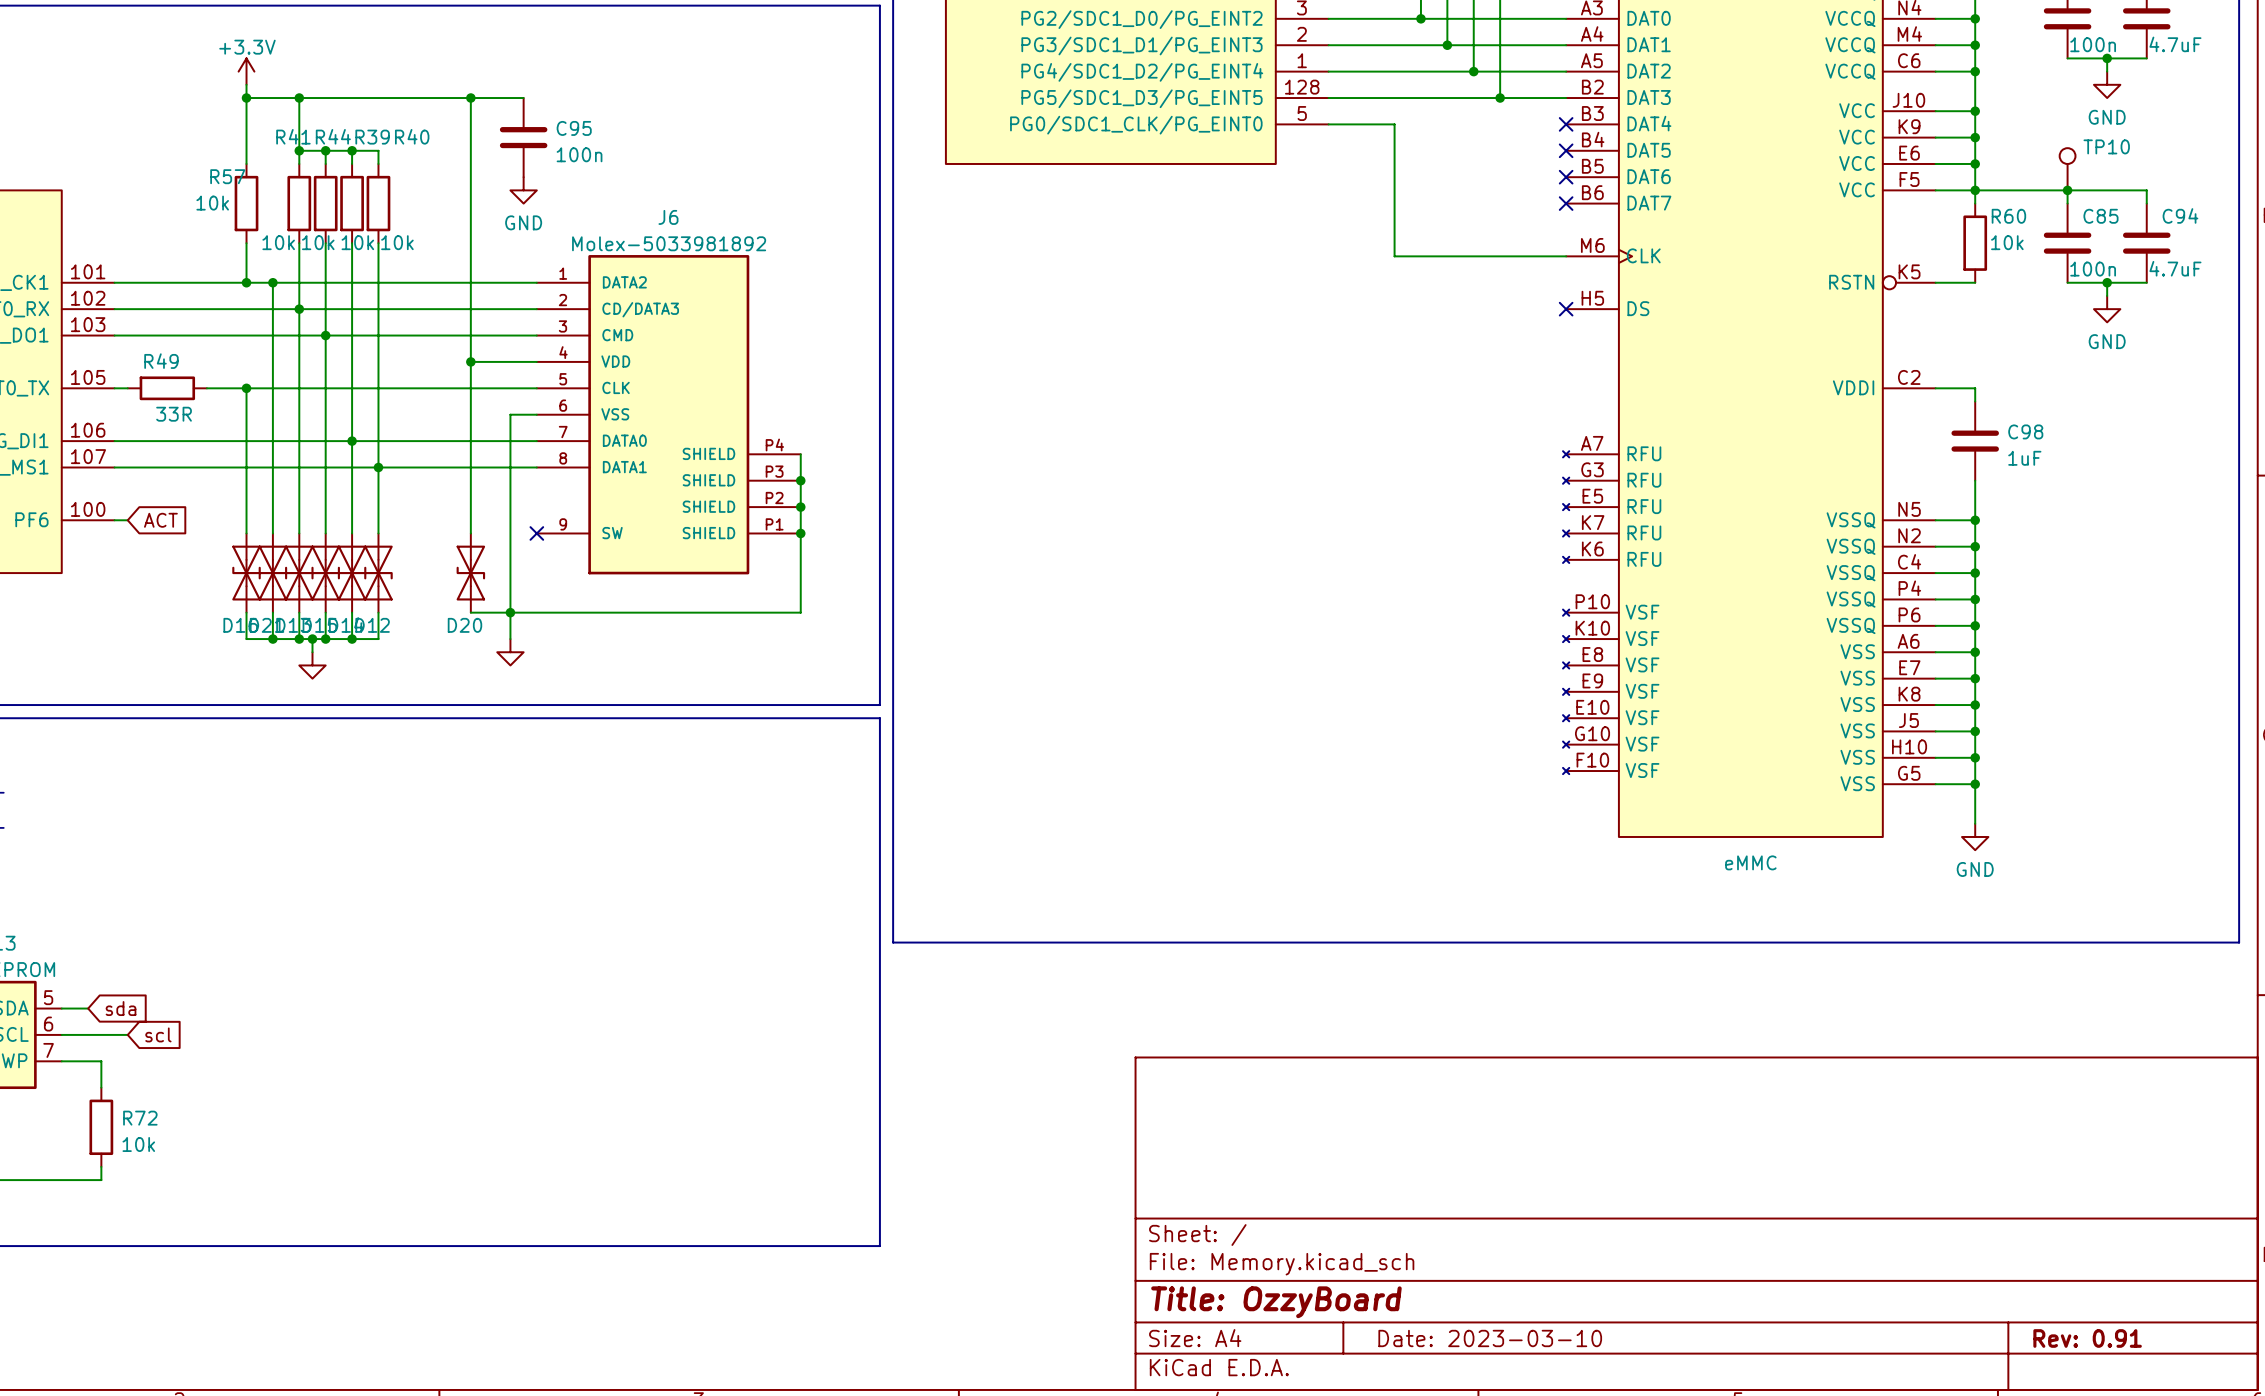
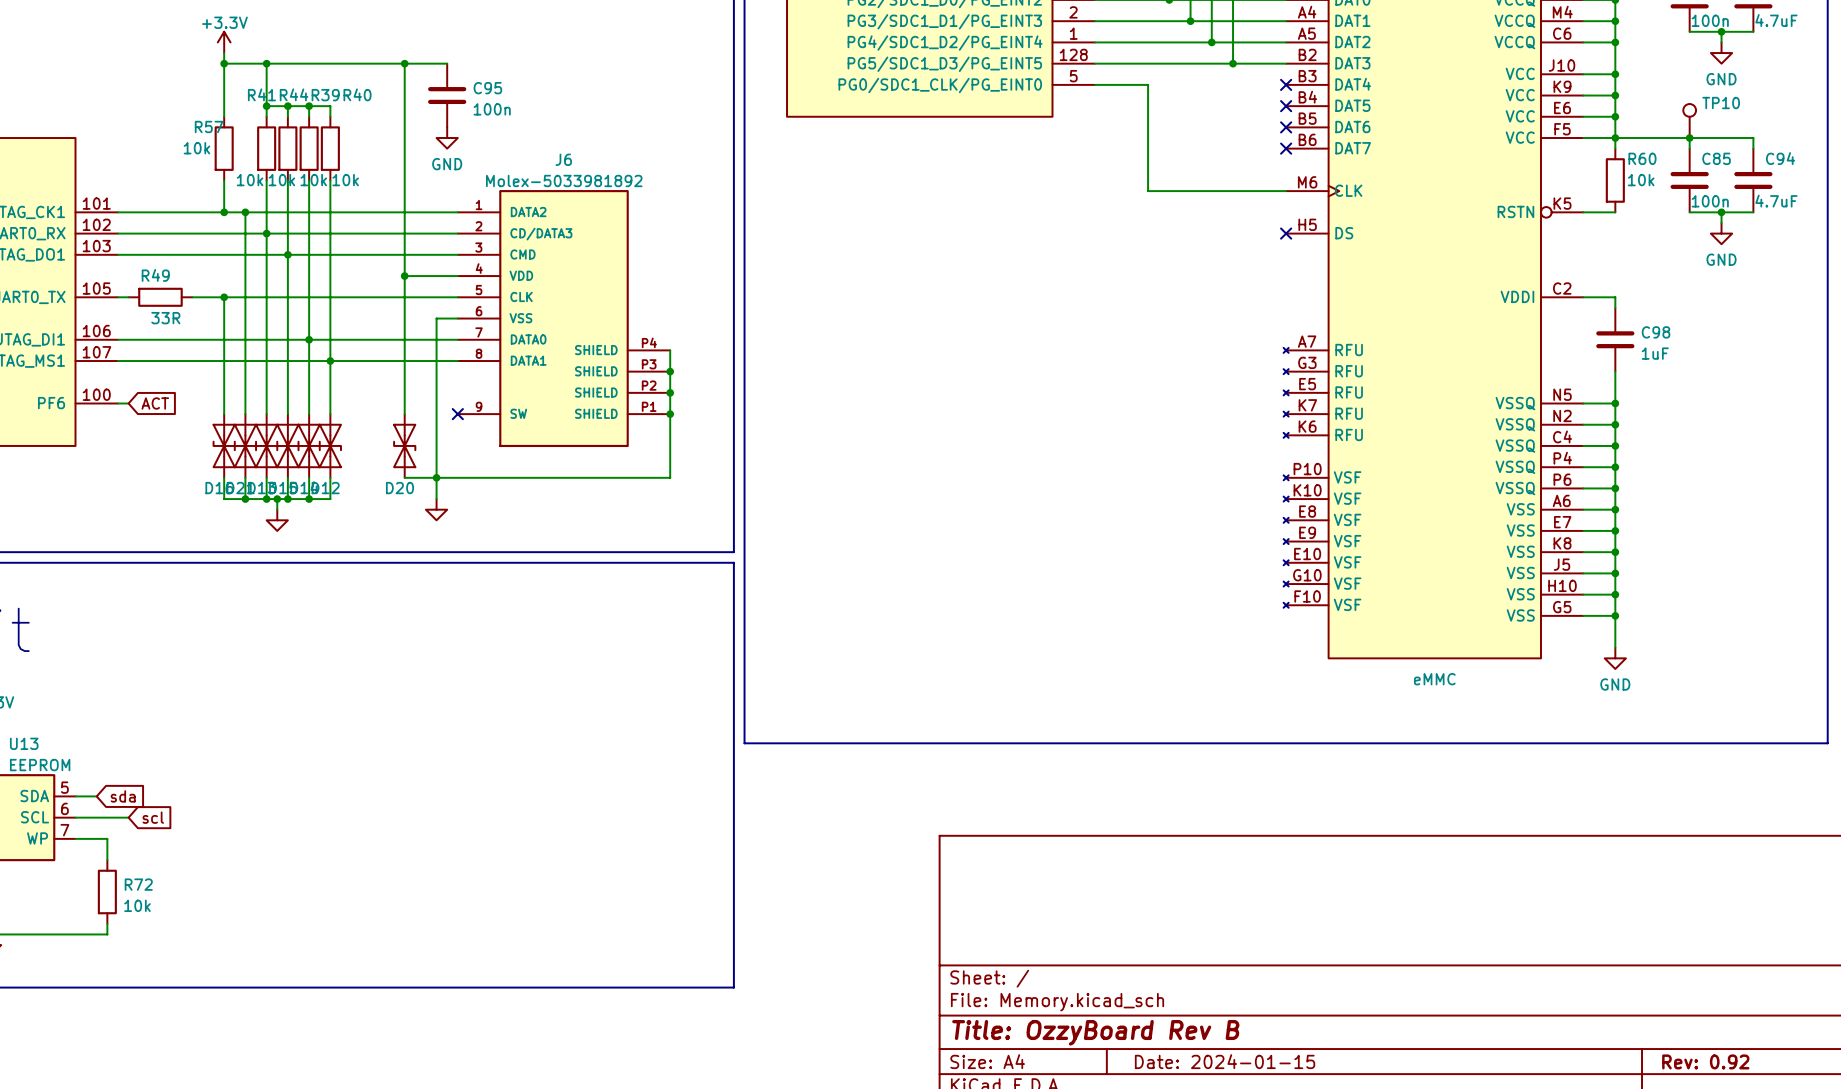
title block: Title: OzzyBoard (1276, 1302) -> Title: OzzyBoard Rev B (1095, 1032)
title block: Date: 2023-03-10 (1490, 1338) -> Date: 2024-01-15 (1225, 1061)
title block: Rev: 0.91 (2087, 1338) -> Rev: 0.92 (1705, 1061)

